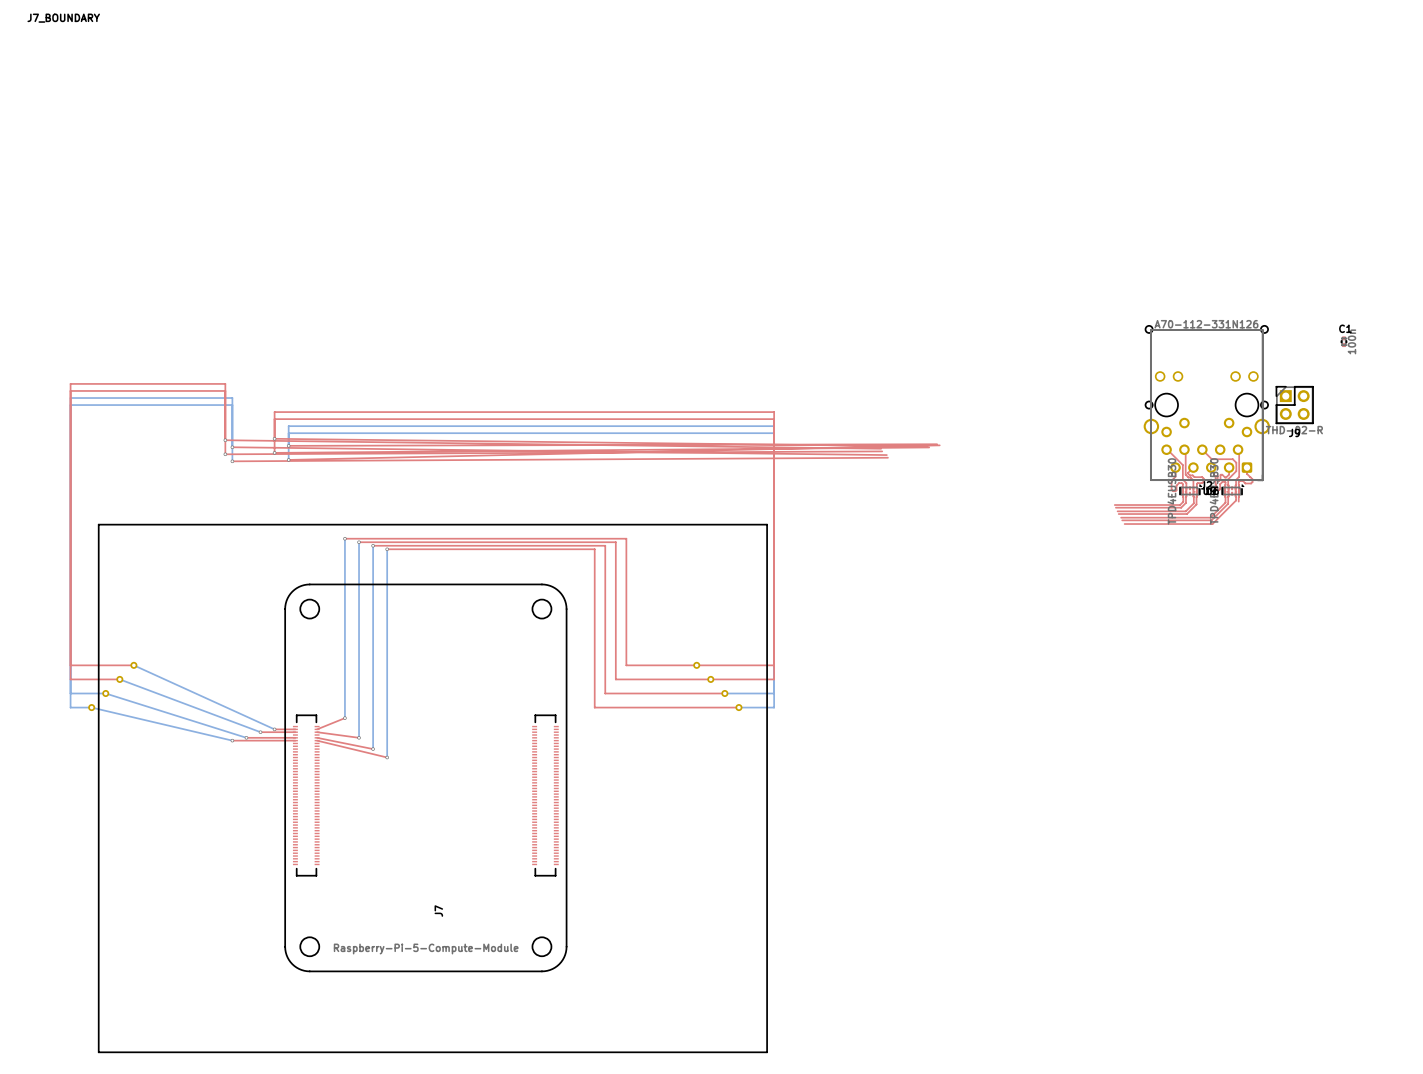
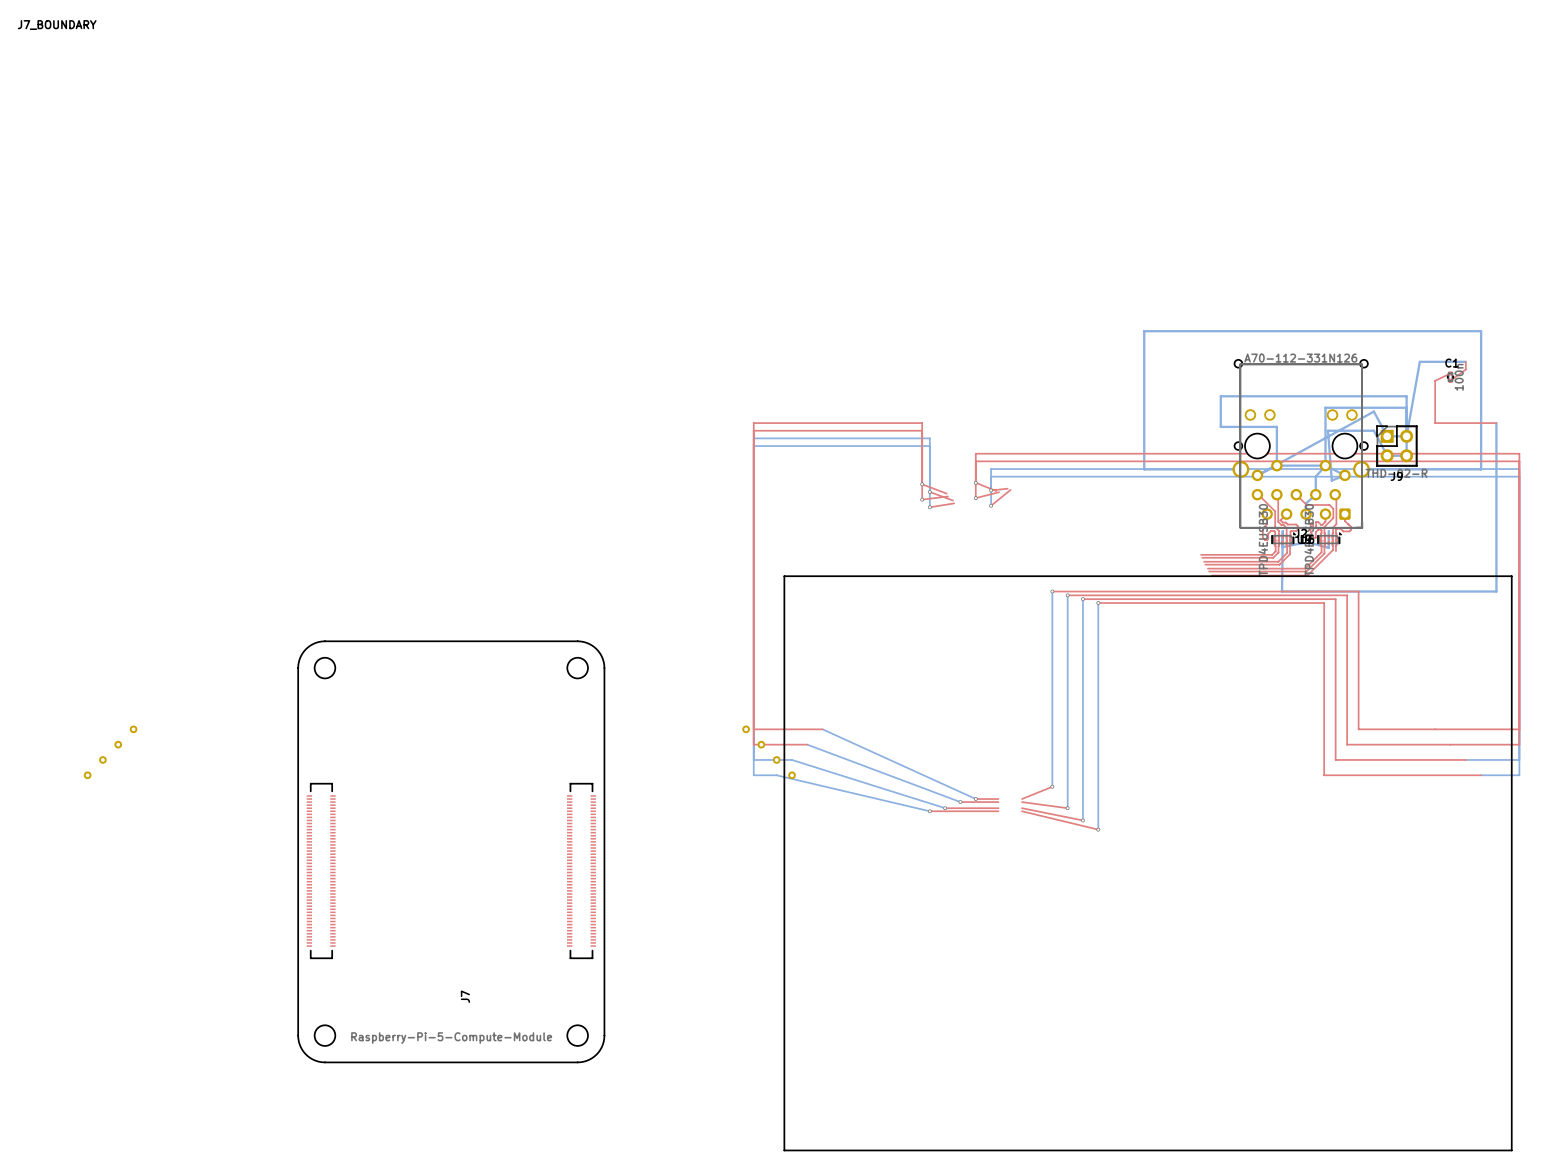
top track: none -> (1465, 361) (1465, 369) (1450, 380)
bottom track: none -> (1465, 361) (1419, 361) (1406, 436) (1387, 436) (1373, 411) (1257, 475) (1276, 465)
top track: none -> (1450, 373) (1435, 380) (1435, 423) (1496, 423)
bottom track: none -> (1406, 407) (1325, 407) (1325, 465)
bottom track: none -> (1496, 423) (1496, 591) (1282, 591) (1282, 531) (1282, 547) (1301, 543) (1311, 543) (1328, 547) (1328, 531)
top track: (70, 390) (225, 390) -> none
top track: none -> (753, 430) (922, 430)
bottom track: (70, 405) (232, 405) -> none
bottom track: none -> (753, 446) (929, 446)
top track: (274, 419) (774, 419) -> none
top track: none -> (975, 461) (1519, 461)
bottom track: none -> (1276, 465) (1276, 426) (1220, 426) (1220, 396) (1406, 396) (1406, 455) (1387, 455) (1373, 430) (1327, 430) (1331, 480) (1344, 475) (1325, 465)
bottom track: none -> (1276, 465) (1325, 465)
bottom track: none -> (1325, 465) (1315, 476) (1315, 494) (1306, 503) (1306, 514)
bottom track: none -> (1240, 469) (1144, 469) (1144, 331) (1481, 331) (1481, 469) (1361, 469)
bottom track: (288, 433) (774, 433) -> none
bottom track: none -> (991, 476) (1519, 476)
top track: (274, 438) (926, 446) -> (975, 482) (996, 491)
via: (274, 438) -> none
via: none -> (975, 482)
top track: (225, 440) (881, 448) -> (922, 484) (946, 493)
via: (225, 440) -> none
via: none -> (922, 484)
top track: (937, 444) (288, 445) -> (1007, 488) (991, 490)
via: (288, 445) -> none
via: none -> (991, 490)
top track: (939, 445) (288, 459) -> (1010, 489) (991, 505)
top track: (232, 447) (886, 455) -> (929, 491) (952, 500)
via: (232, 447) -> none
via: none -> (929, 491)
top track: (929, 447) (274, 452) (274, 412) (774, 412) (774, 679) (753, 679) -> (999, 492) (975, 498) (975, 453) (1519, 453) (1519, 744) (1347, 744) (1347, 595) (1067, 595)
top track: (882, 451) (225, 454) (225, 383) (70, 383) (70, 679) (119, 679) -> none
via: (274, 452) -> none
via: none -> (975, 498)
via: (225, 454) -> none
via: none -> (922, 499)
top track: (887, 457) (232, 461) -> (954, 503) (929, 507)
bottom track: (288, 459) (288, 426) (774, 426) (774, 707) (738, 707) -> none
via: (288, 459) -> none
bottom track: none -> (991, 505) (991, 469) (1519, 469) (1519, 775) (1481, 775)
via: none -> (991, 505)
bottom track: (232, 461) (232, 398) (70, 398) (70, 707) (91, 707) (232, 740) -> none
via: (232, 461) -> none
bottom track: none -> (929, 507) (929, 438) (753, 438) (753, 775) (776, 775) (929, 811)
via: none -> (929, 507)
board edge: (731, 524) (98, 524) (98, 1052) (731, 1052) -> (784, 576) (784, 1150)
board edge: (767, 524) (767, 1052) -> (822, 576) (1511, 576) (1511, 1150) (822, 1150)
top track: (344, 538) (626, 538) (626, 665) (703, 665) -> none
bottom track: (344, 538) (344, 718) -> none
via: (344, 538) -> none
top track: none -> (1052, 591) (1358, 591) (1358, 729) (1519, 729)
bottom track: none -> (1052, 591) (1052, 786)
via: none -> (1052, 591)
top track: (359, 542) (615, 542) (615, 679) (703, 679) -> (947, 496) (922, 499) (922, 423) (753, 423) (753, 744)
bottom track: (359, 542) (359, 737) -> none
via: (359, 542) -> none
bottom track: none -> (1067, 595) (1067, 808)
via: none -> (1067, 595)
top track: (373, 545) (605, 545) (605, 693) (724, 693) -> none
bottom track: (373, 545) (373, 749) -> none
via: (373, 545) -> none
top track: none -> (1082, 599) (1335, 599) (1335, 759) (1465, 759)
bottom track: none -> (1082, 599) (1082, 820)
via: none -> (1082, 599)
top track: (387, 549) (594, 549) (594, 707) (738, 707) -> none
bottom track: (387, 549) (387, 757) -> none
via: (387, 549) -> none
top track: none -> (1098, 603) (1324, 603) (1324, 775) (1481, 775)
bottom track: none -> (1098, 603) (1098, 829)
via: none -> (1098, 603)
top track: (70, 665) (133, 665) -> none
bottom track: (133, 665) (274, 729) -> none
top track: (767, 665) (774, 665) -> none
bottom track: none -> (822, 729) (975, 799)
bottom track: (119, 679) (260, 732) -> none
bottom track: none -> (807, 744) (960, 802)
bottom track: (70, 693) (105, 693) (246, 737) -> none
bottom track: none -> (753, 759) (776, 759)
bottom track: (738, 693) (774, 693) -> (792, 759) (945, 808)
bottom track: none -> (1465, 759) (1519, 759)
top track: (344, 718) (317, 729) -> none
via: (344, 718) -> none
top track: none -> (1052, 786) (1022, 799)
via: none -> (1052, 786)
top track: (274, 729) (295, 729) -> none
via: (274, 729) -> none
top track: none -> (975, 799) (998, 799)
via: none -> (975, 799)
top track: (260, 732) (295, 732) -> none
via: (260, 732) -> none
top track: (317, 732) (359, 737) -> none
top track: none -> (960, 802) (998, 802)
via: none -> (960, 802)
top track: none -> (1022, 802) (1067, 808)
top track: (246, 737) (295, 737) -> none
via: (246, 737) -> none
top track: (317, 737) (373, 749) -> none
via: (359, 737) -> none
top track: none -> (945, 808) (998, 808)
via: none -> (945, 808)
top track: none -> (1022, 808) (1082, 820)
via: none -> (1067, 808)
top track: (232, 740) (295, 740) -> none
via: (232, 740) -> none
top track: (317, 740) (387, 757) -> none
top track: none -> (929, 811) (998, 811)
via: none -> (929, 811)
top track: none -> (1022, 811) (1098, 829)
via: (373, 749) -> none
via: none -> (1082, 820)
via: (387, 757) -> none
via: none -> (1098, 829)

